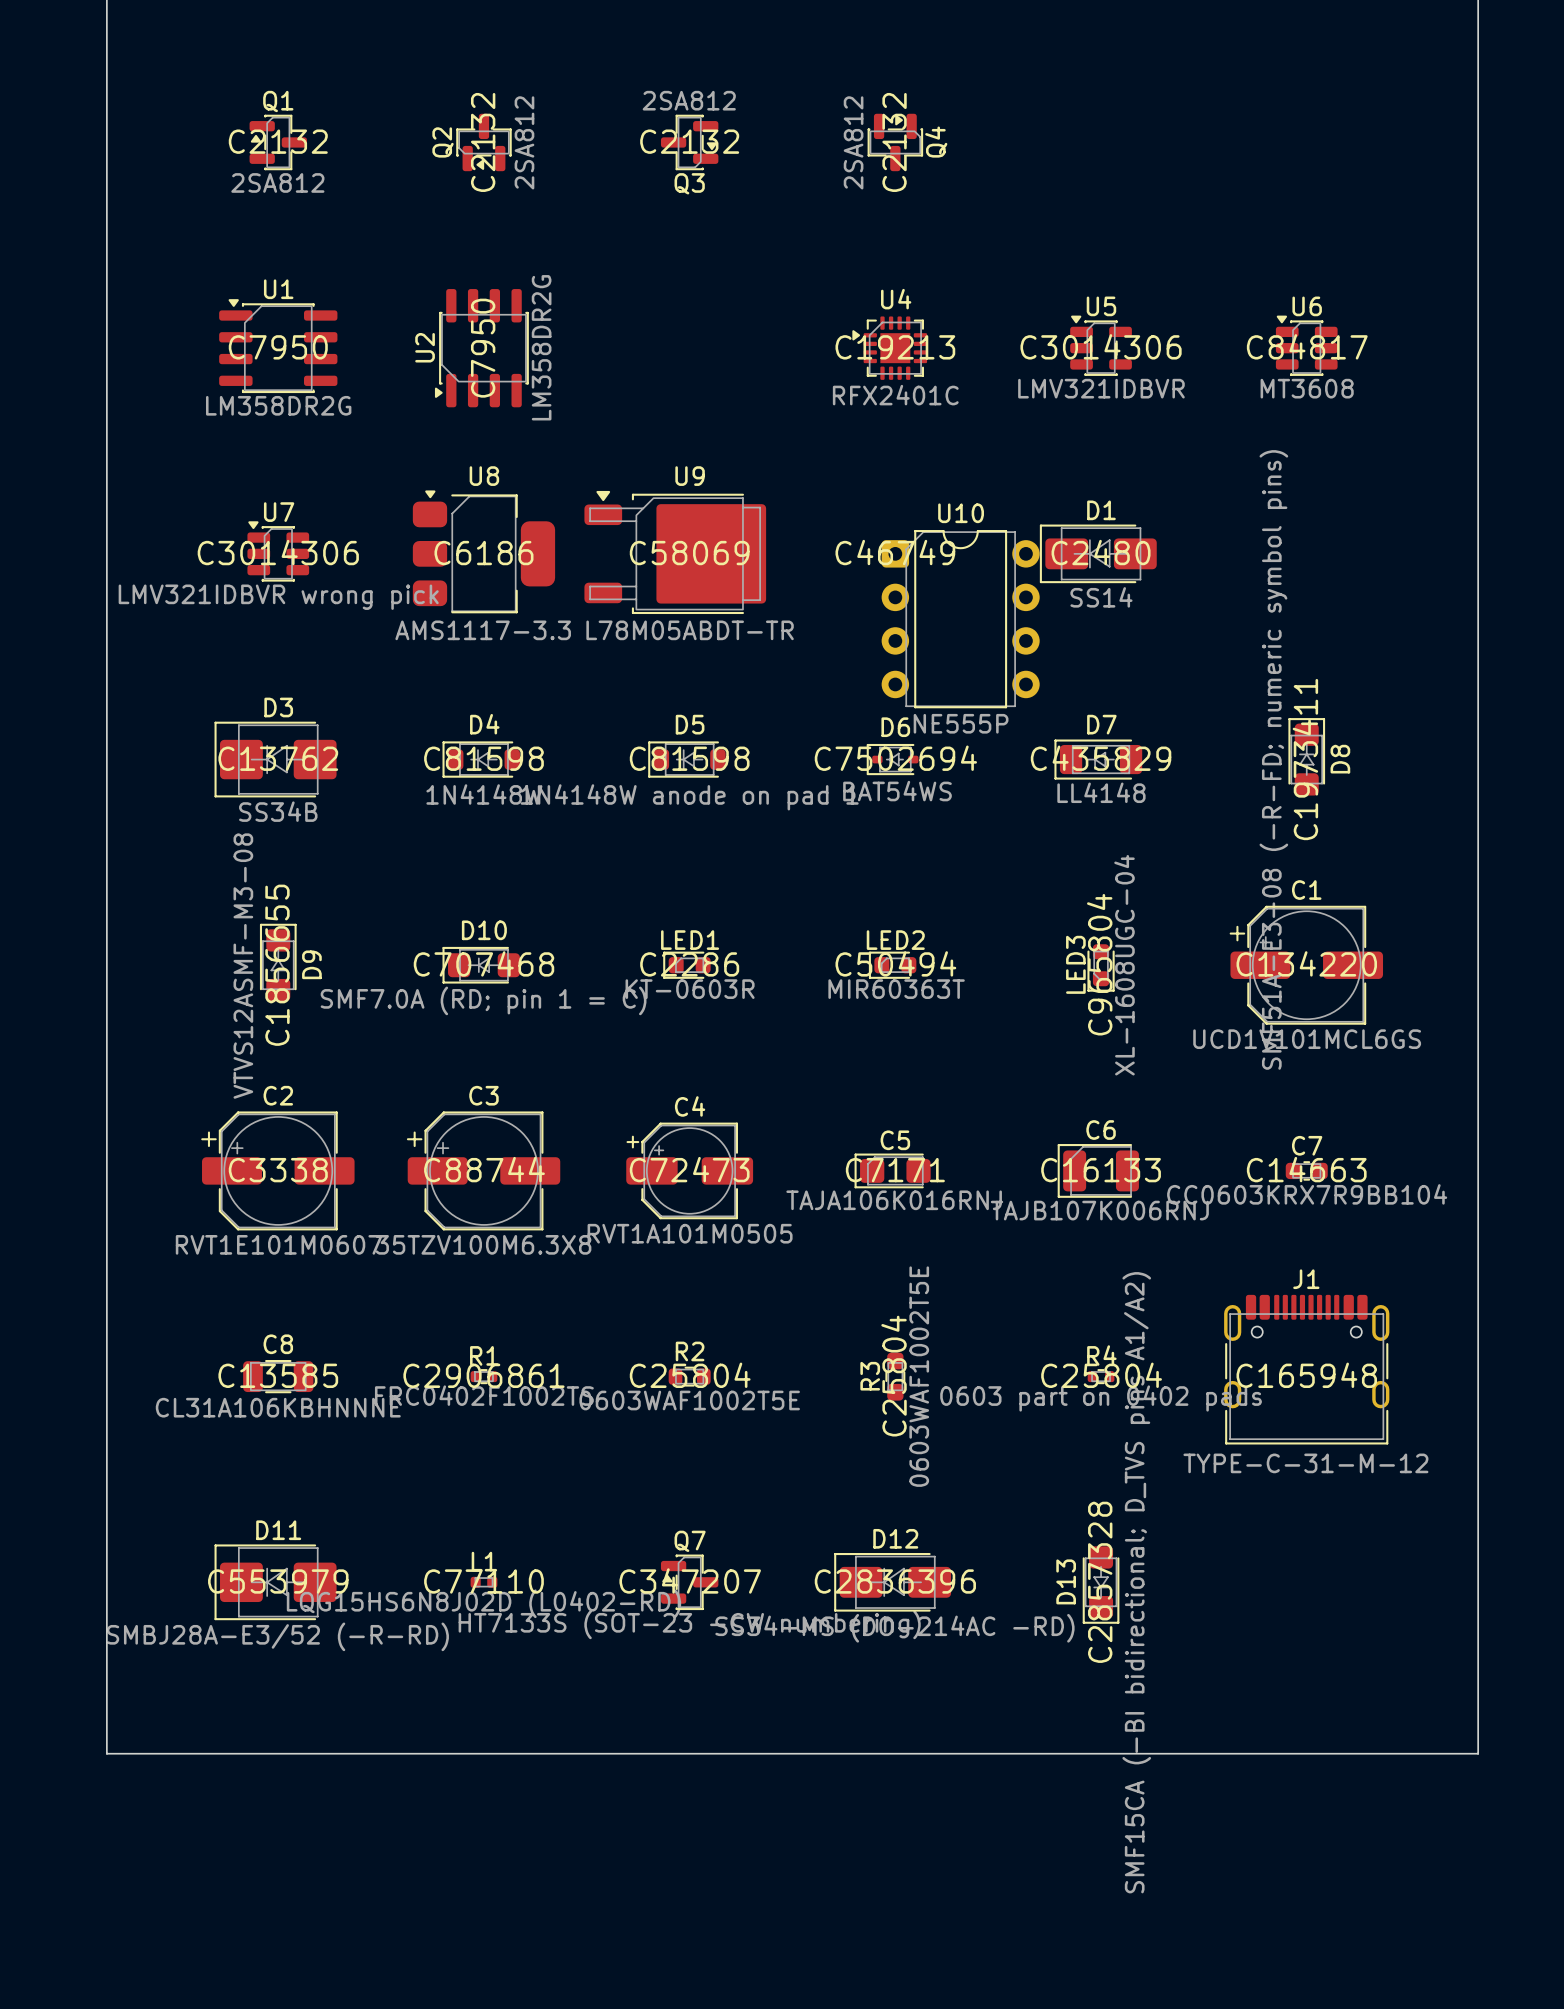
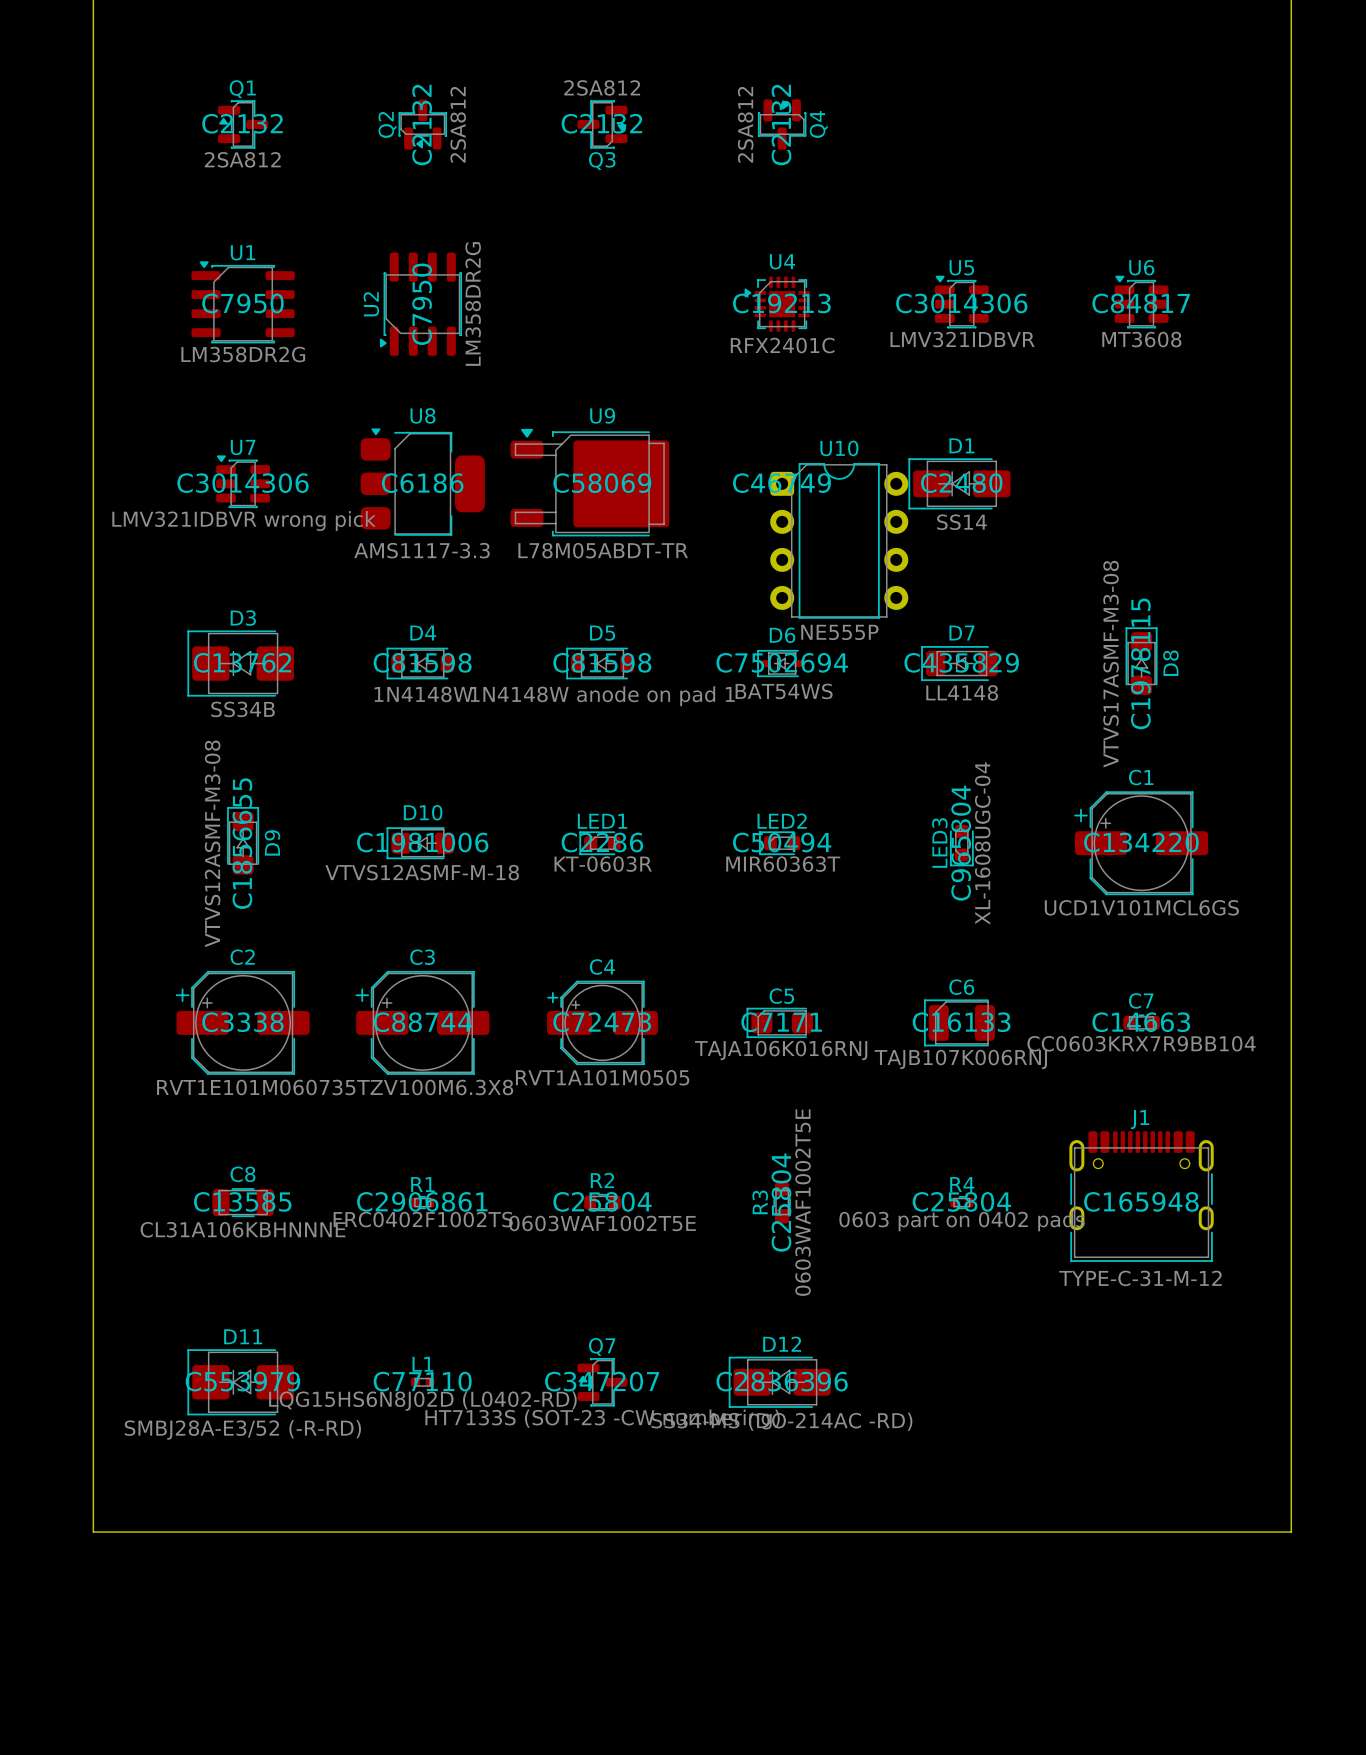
D8 value: SMF51A-E3-08 (-R-FD; numeric symbol pins) (1273, 759) -> VTVS17ASMF-M3-08 (1111, 664)
D8 text: C1973411 (1305, 759) -> C1978115 (1140, 663)
D10 text: C707468 (483, 963) -> C1981006 (422, 842)
D10 value: SMF7.0A (RD; pin 1 = C) (483, 1000) -> VTVS12ASMF-M-18 (422, 872)
D13: SMF15CA (-BI bidirectional; D_TVS pins A1/A2) (1101, 1585) -> none

